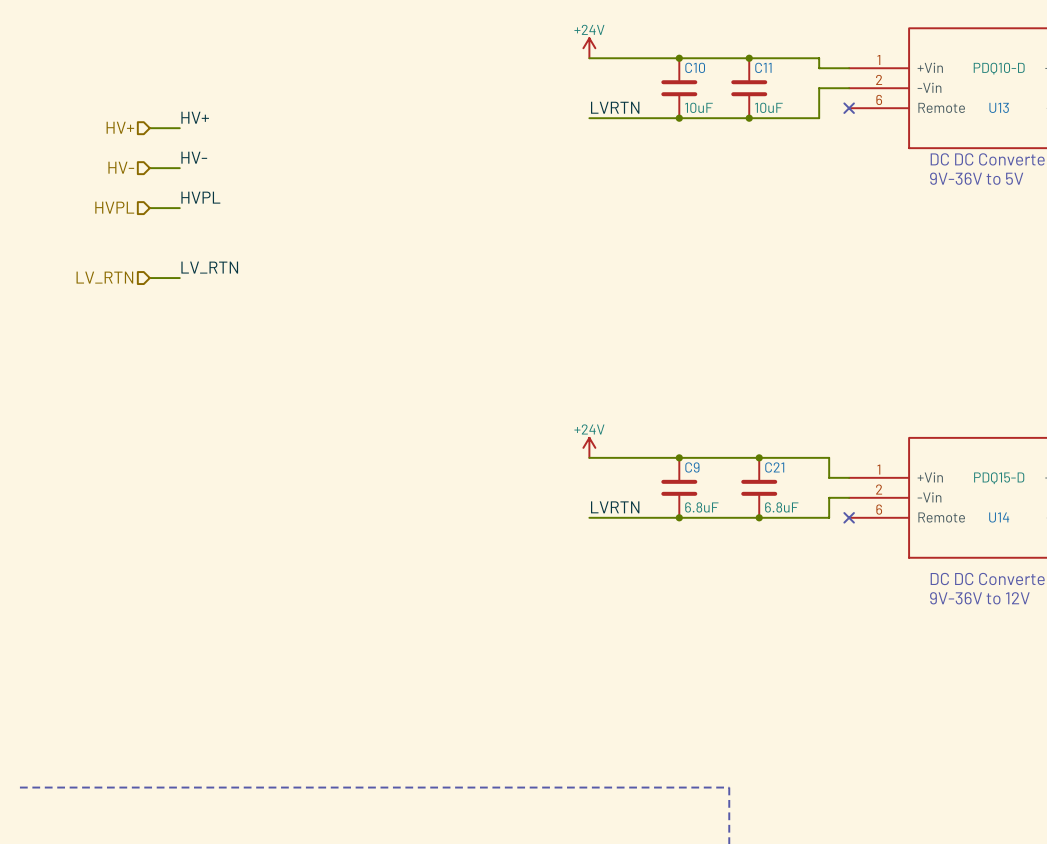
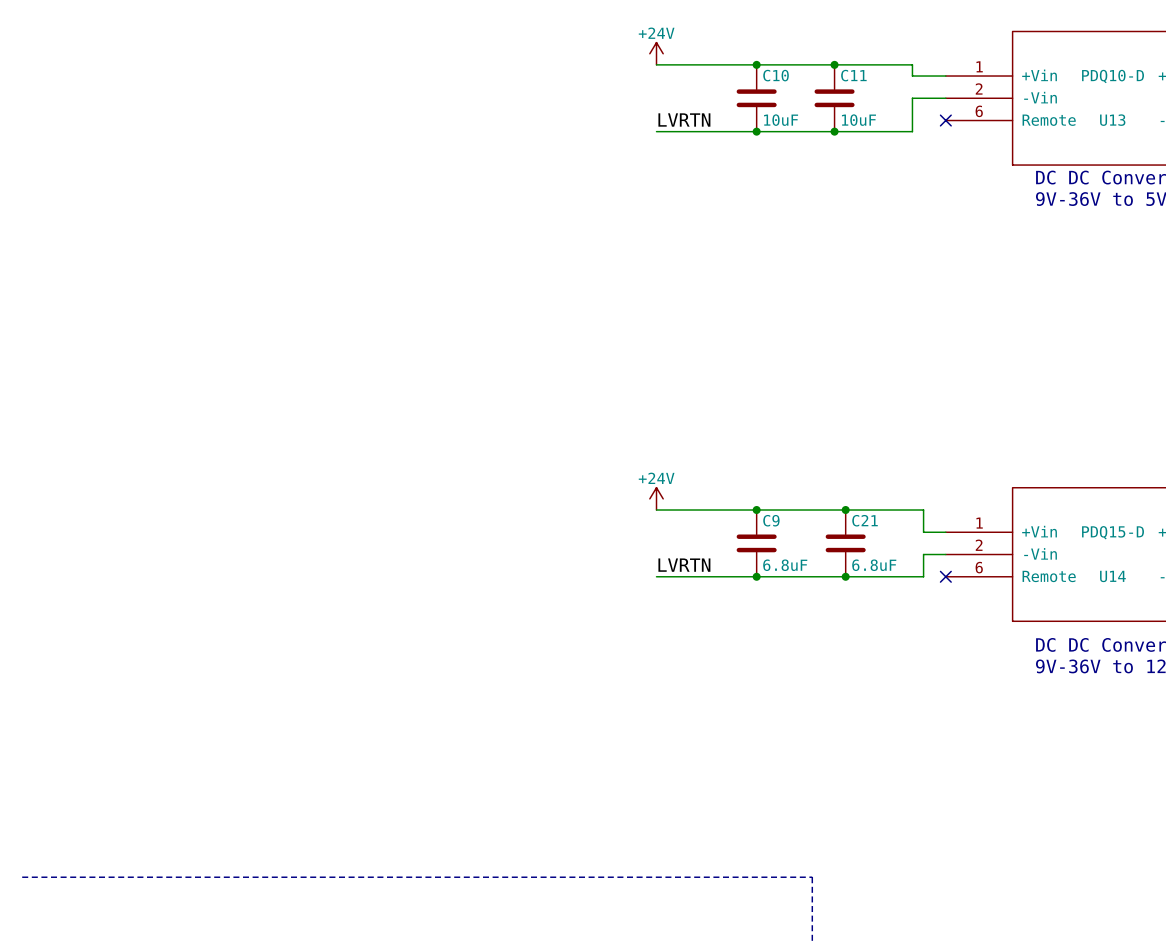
label: HV+ (195, 117) -> none
hierarchical label: HV+ (120, 127) -> none
wire: (149, 128) (179, 128) -> none
label: HV- (194, 157) -> none
hierarchical label: HV- (121, 167) -> none
wire: (149, 168) (179, 168) -> none
label: HVPL (200, 197) -> none
hierarchical label: HVPL (114, 207) -> none
wire: (149, 208) (179, 208) -> none
label: LV_RTN (209, 267) -> none
hierarchical label: LV_RTN (104, 277) -> none
wire: (149, 278) (179, 278) -> none

